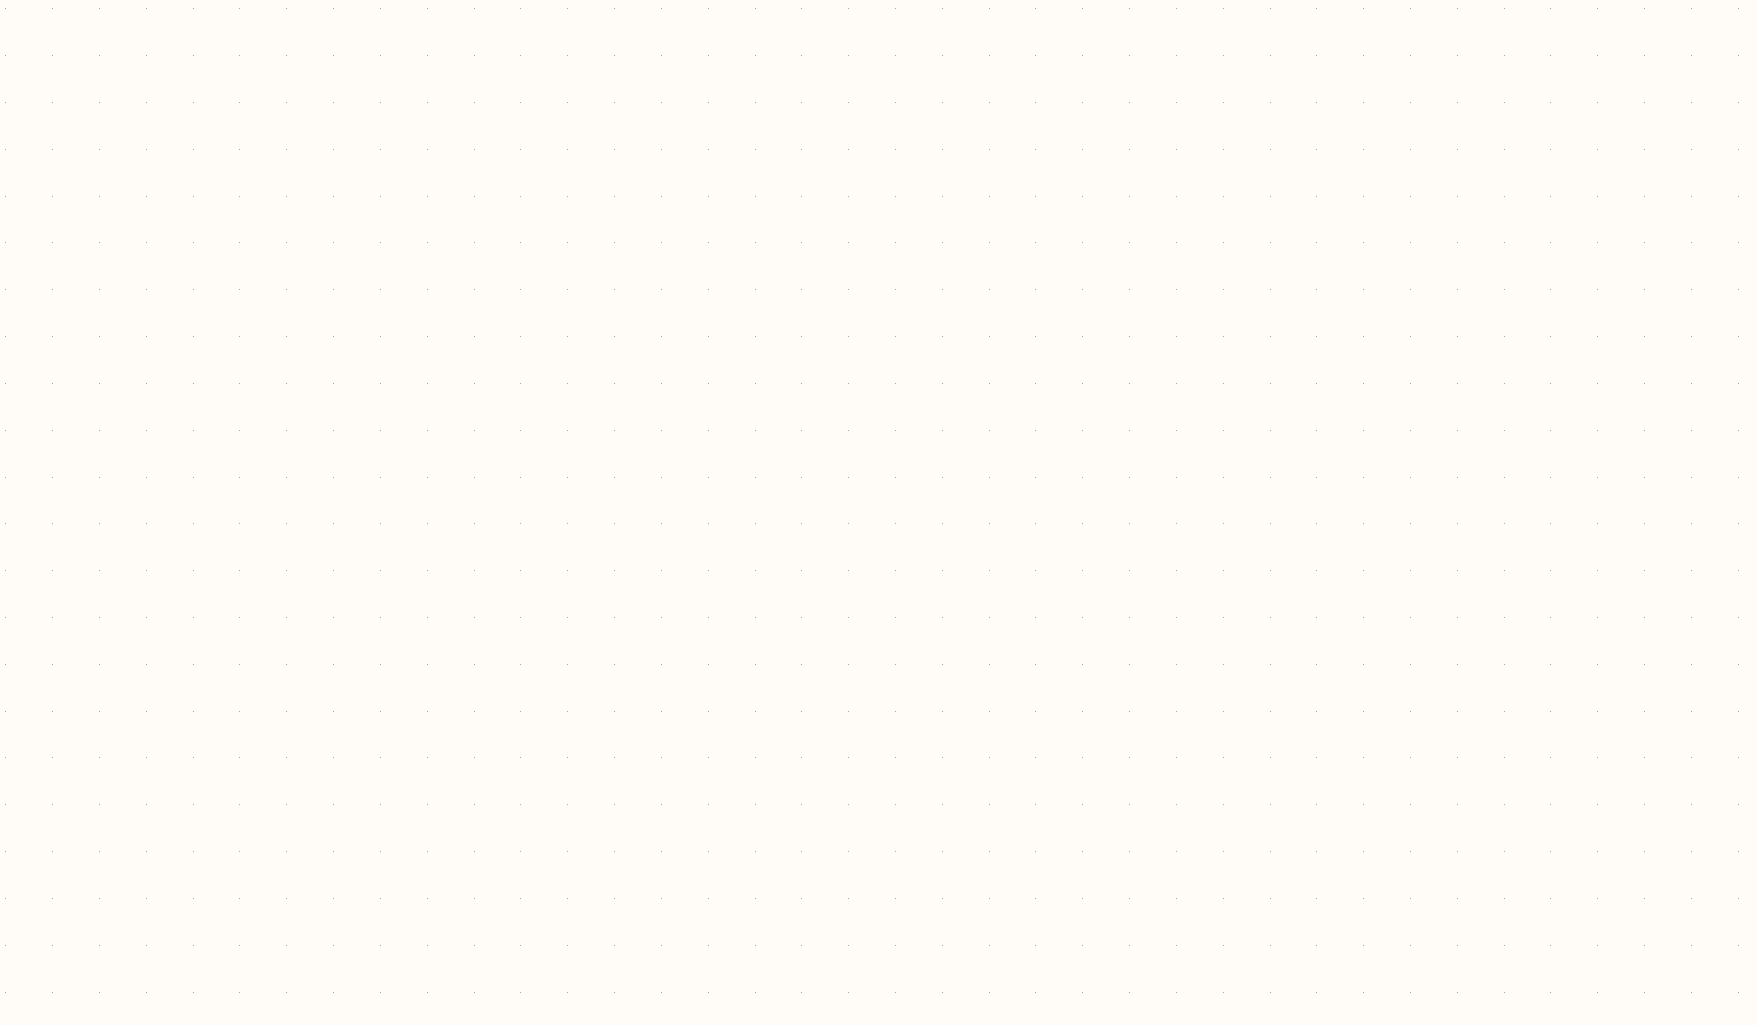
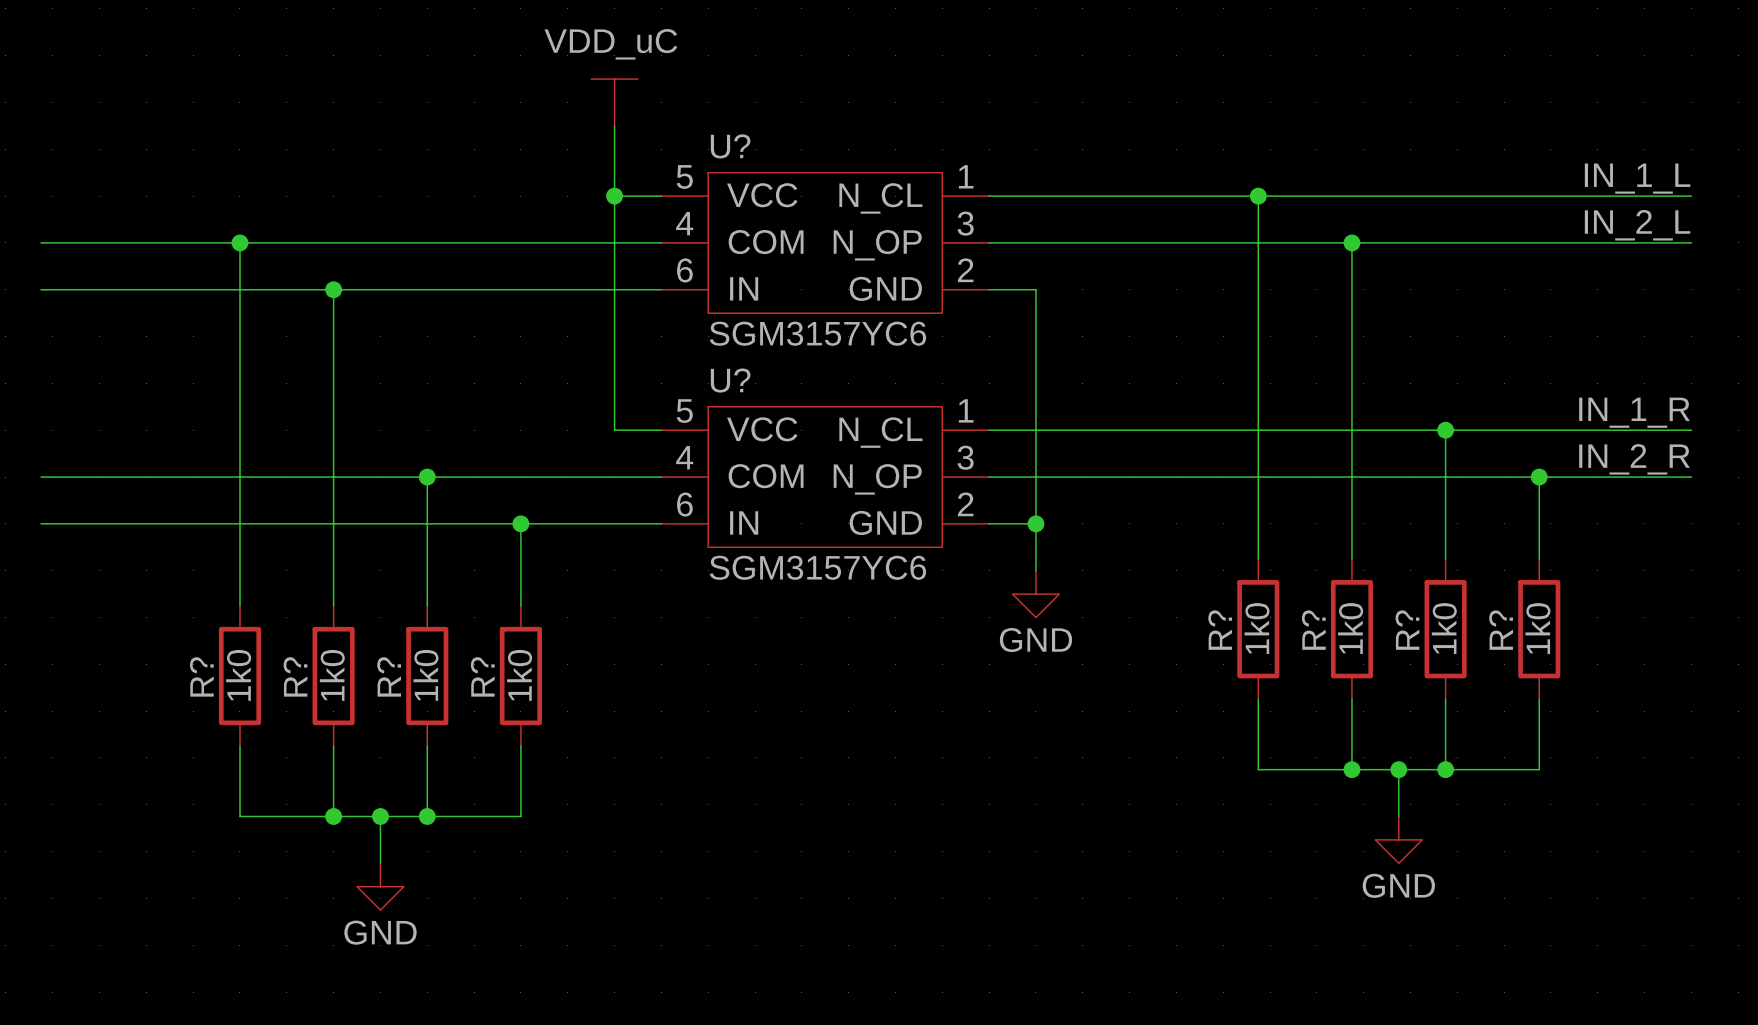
power symbol: none -> VDD_uC (614, 102)
wire: none -> (614, 125) (614, 430) (661, 430)
label: none -> IN_1_L (1637, 178)
wire: none -> (614, 196) (661, 196)
junction: none -> (614, 196)
wire: none -> (989, 196) (1691, 196)
wire: none -> (1258, 196) (1258, 558)
junction: none -> (1258, 196)
label: none -> IN_2_L (1637, 225)
wire: none -> (41, 242) (661, 242)
wire: none -> (239, 242) (239, 605)
junction: none -> (239, 242)
U?: none -> SGM3157YC6 (825, 242)
wire: none -> (989, 242) (1691, 242)
wire: none -> (1351, 242) (1351, 558)
junction: none -> (1351, 242)
wire: none -> (41, 289) (661, 289)
wire: none -> (333, 289) (333, 605)
junction: none -> (333, 289)
wire: none -> (989, 289) (1035, 289) (1035, 570)
label: none -> IN_1_R (1634, 412)
wire: none -> (989, 430) (1691, 430)
wire: none -> (1445, 430) (1445, 558)
junction: none -> (1445, 430)
label: none -> IN_2_R (1634, 459)
wire: none -> (41, 477) (661, 477)
wire: none -> (427, 477) (427, 605)
junction: none -> (427, 477)
U?: none -> SGM3157YC6 (825, 477)
wire: none -> (989, 477) (1691, 477)
wire: none -> (1539, 477) (1539, 558)
junction: none -> (1539, 477)
wire: none -> (41, 523) (661, 523)
wire: none -> (520, 523) (520, 605)
junction: none -> (520, 523)
wire: none -> (989, 523) (1035, 523)
junction: none -> (1035, 523)
power symbol: none -> GND (1035, 594)
R?: none -> (1258, 629)
R?: none -> (1351, 629)
R?: none -> (1445, 629)
R?: none -> (1539, 629)
R?: none -> (239, 676)
R?: none -> (333, 676)
R?: none -> (427, 676)
R?: none -> (520, 676)
wire: none -> (1258, 699) (1258, 769) (1539, 769) (1539, 699)
wire: none -> (1351, 699) (1351, 769)
wire: none -> (1445, 699) (1445, 769)
wire: none -> (239, 746) (239, 816) (520, 816) (520, 746)
wire: none -> (333, 746) (333, 816)
wire: none -> (427, 746) (427, 816)
junction: none -> (1351, 769)
wire: none -> (1398, 769) (1398, 816)
junction: none -> (1398, 769)
junction: none -> (1445, 769)
junction: none -> (333, 816)
wire: none -> (380, 816) (380, 863)
junction: none -> (380, 816)
junction: none -> (427, 816)
power symbol: none -> GND (1398, 839)
power symbol: none -> GND (380, 886)

